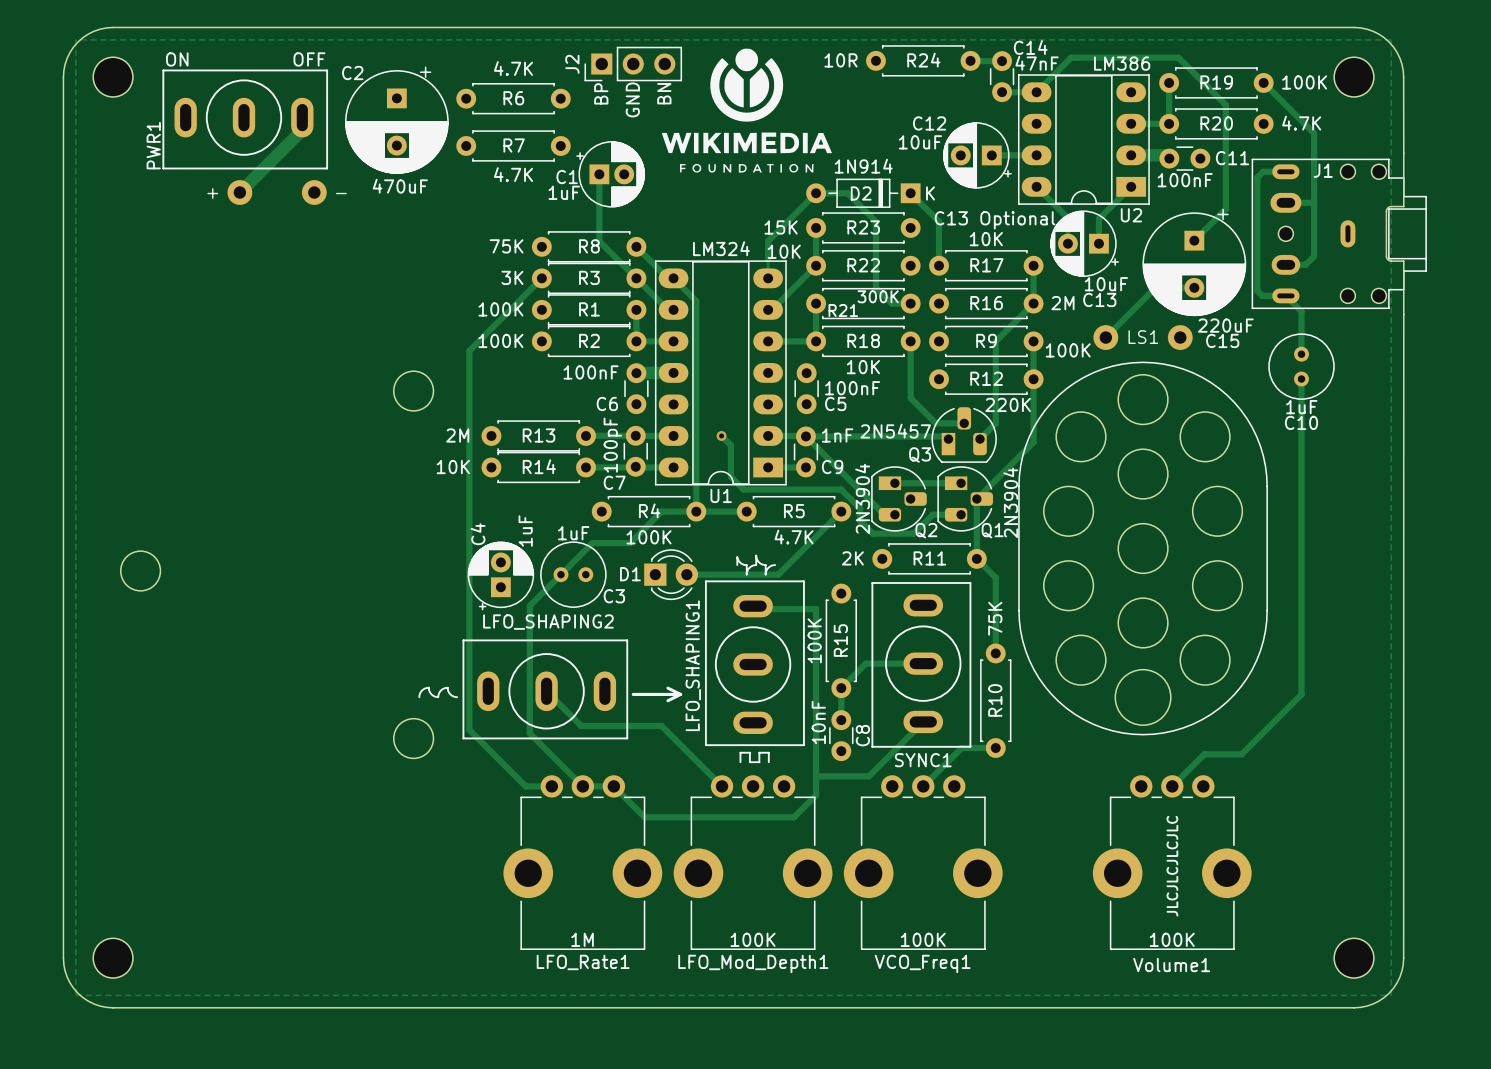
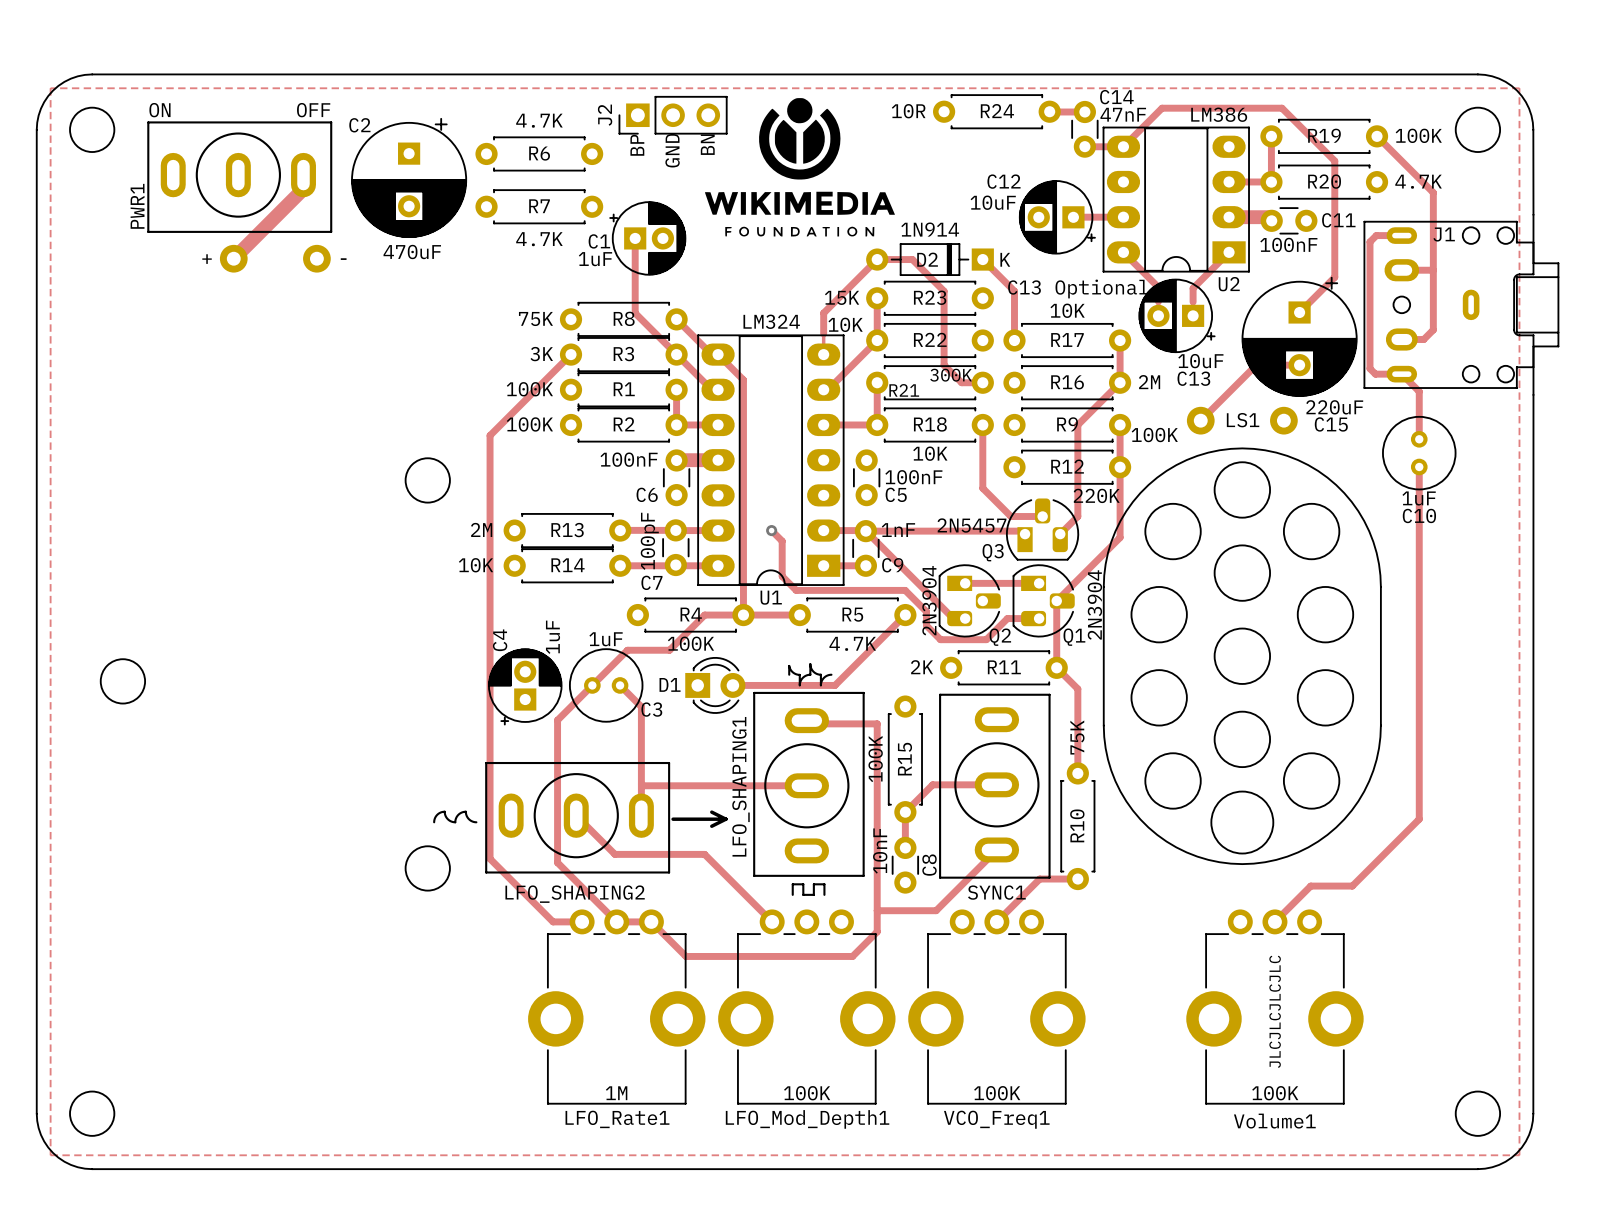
track: none -> (620, 685) (641, 706) (641, 815)
track: none -> (641, 784) (643, 785) (806, 785)
LFO_SHAPING2 rotation: 0° (545, 689) -> 180° (577, 817)

